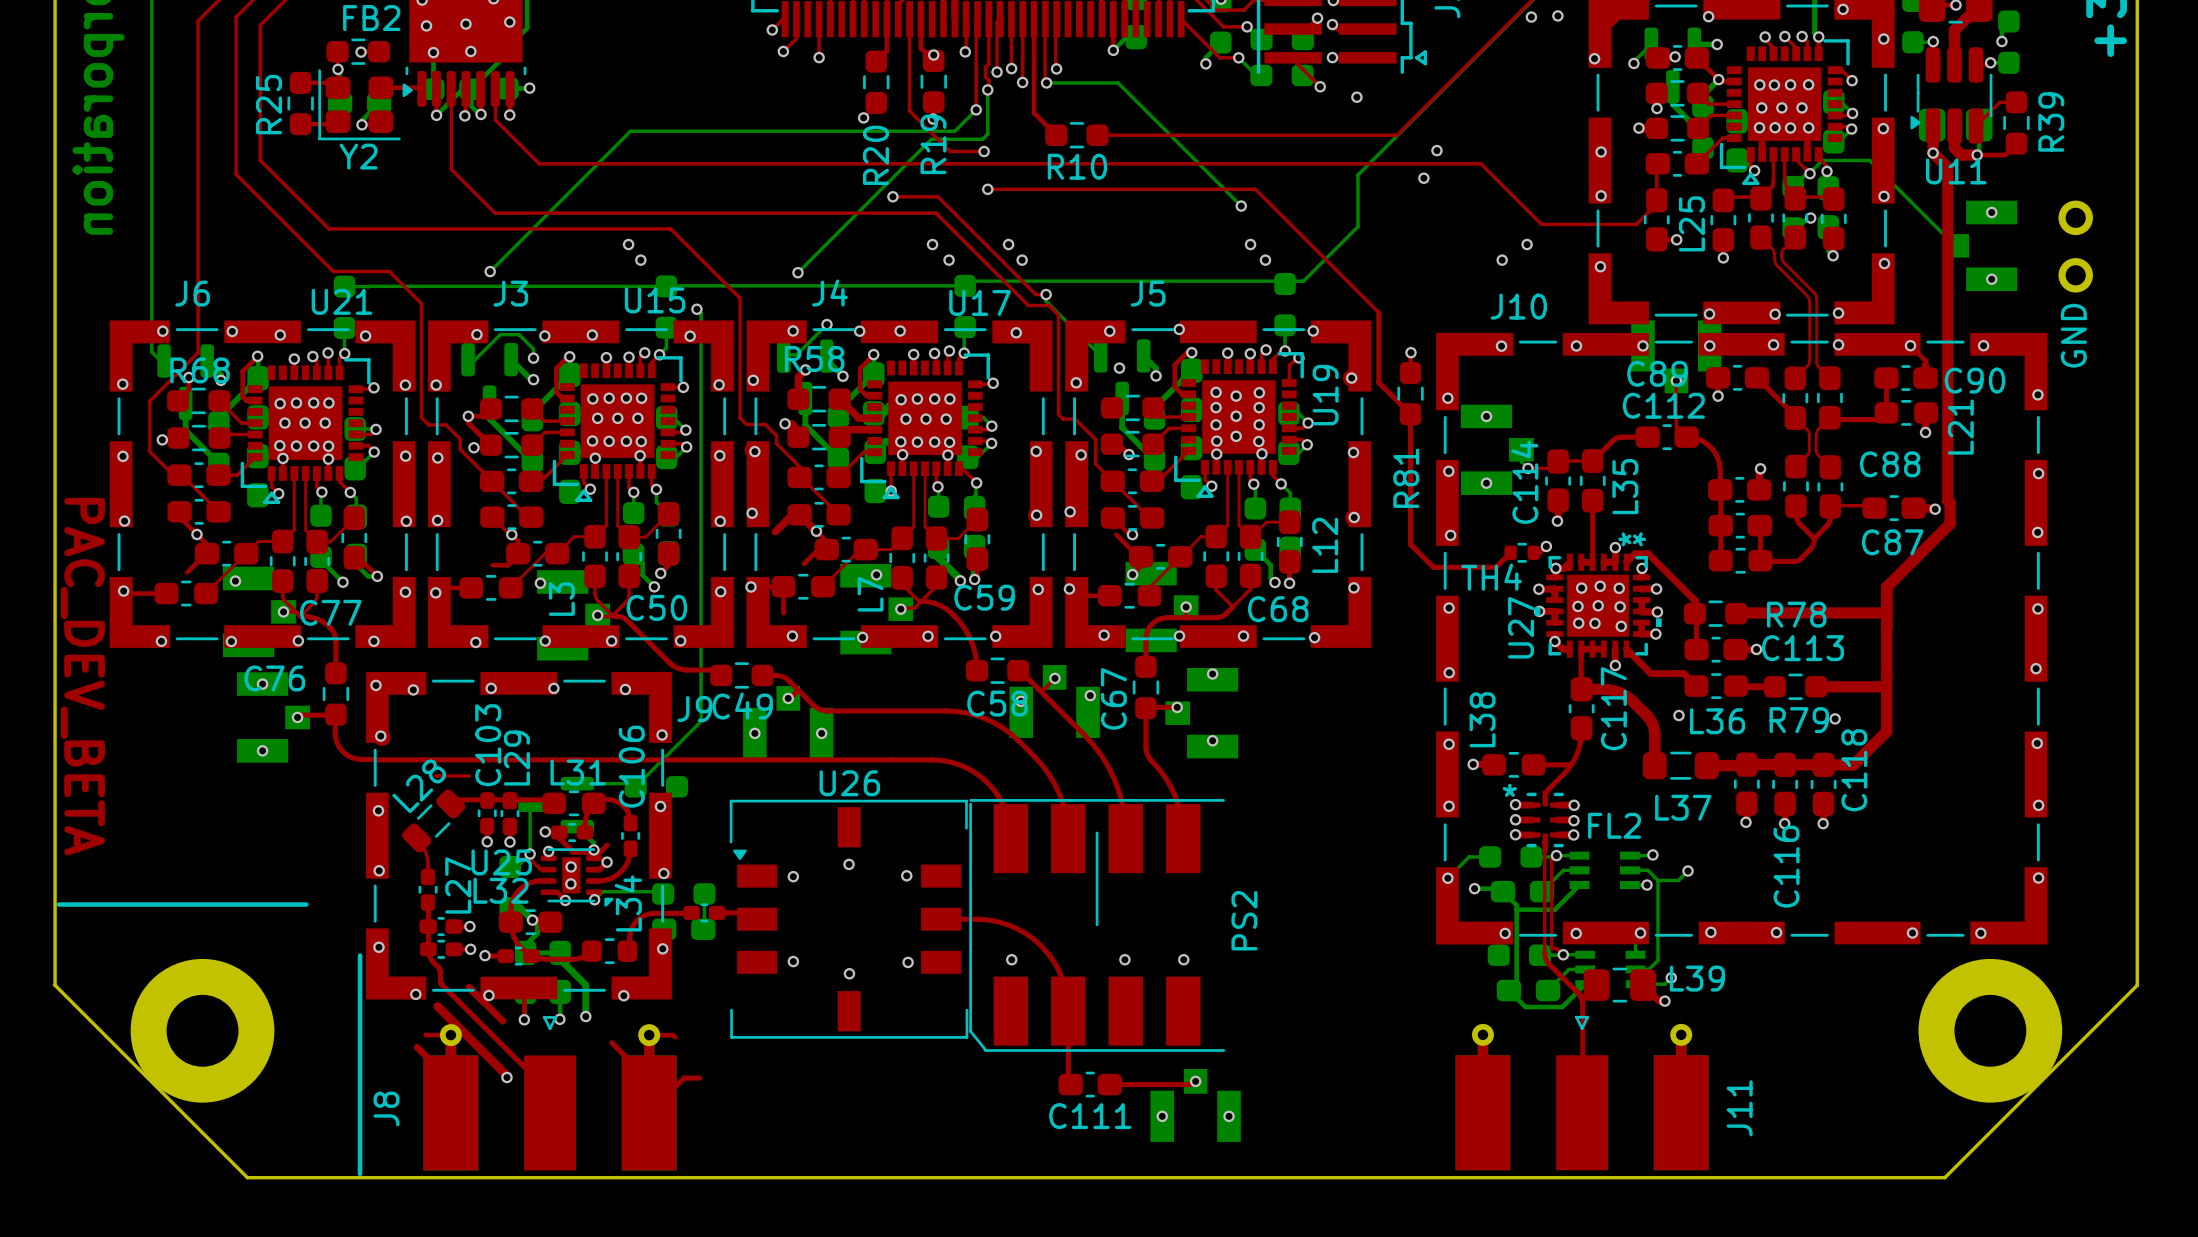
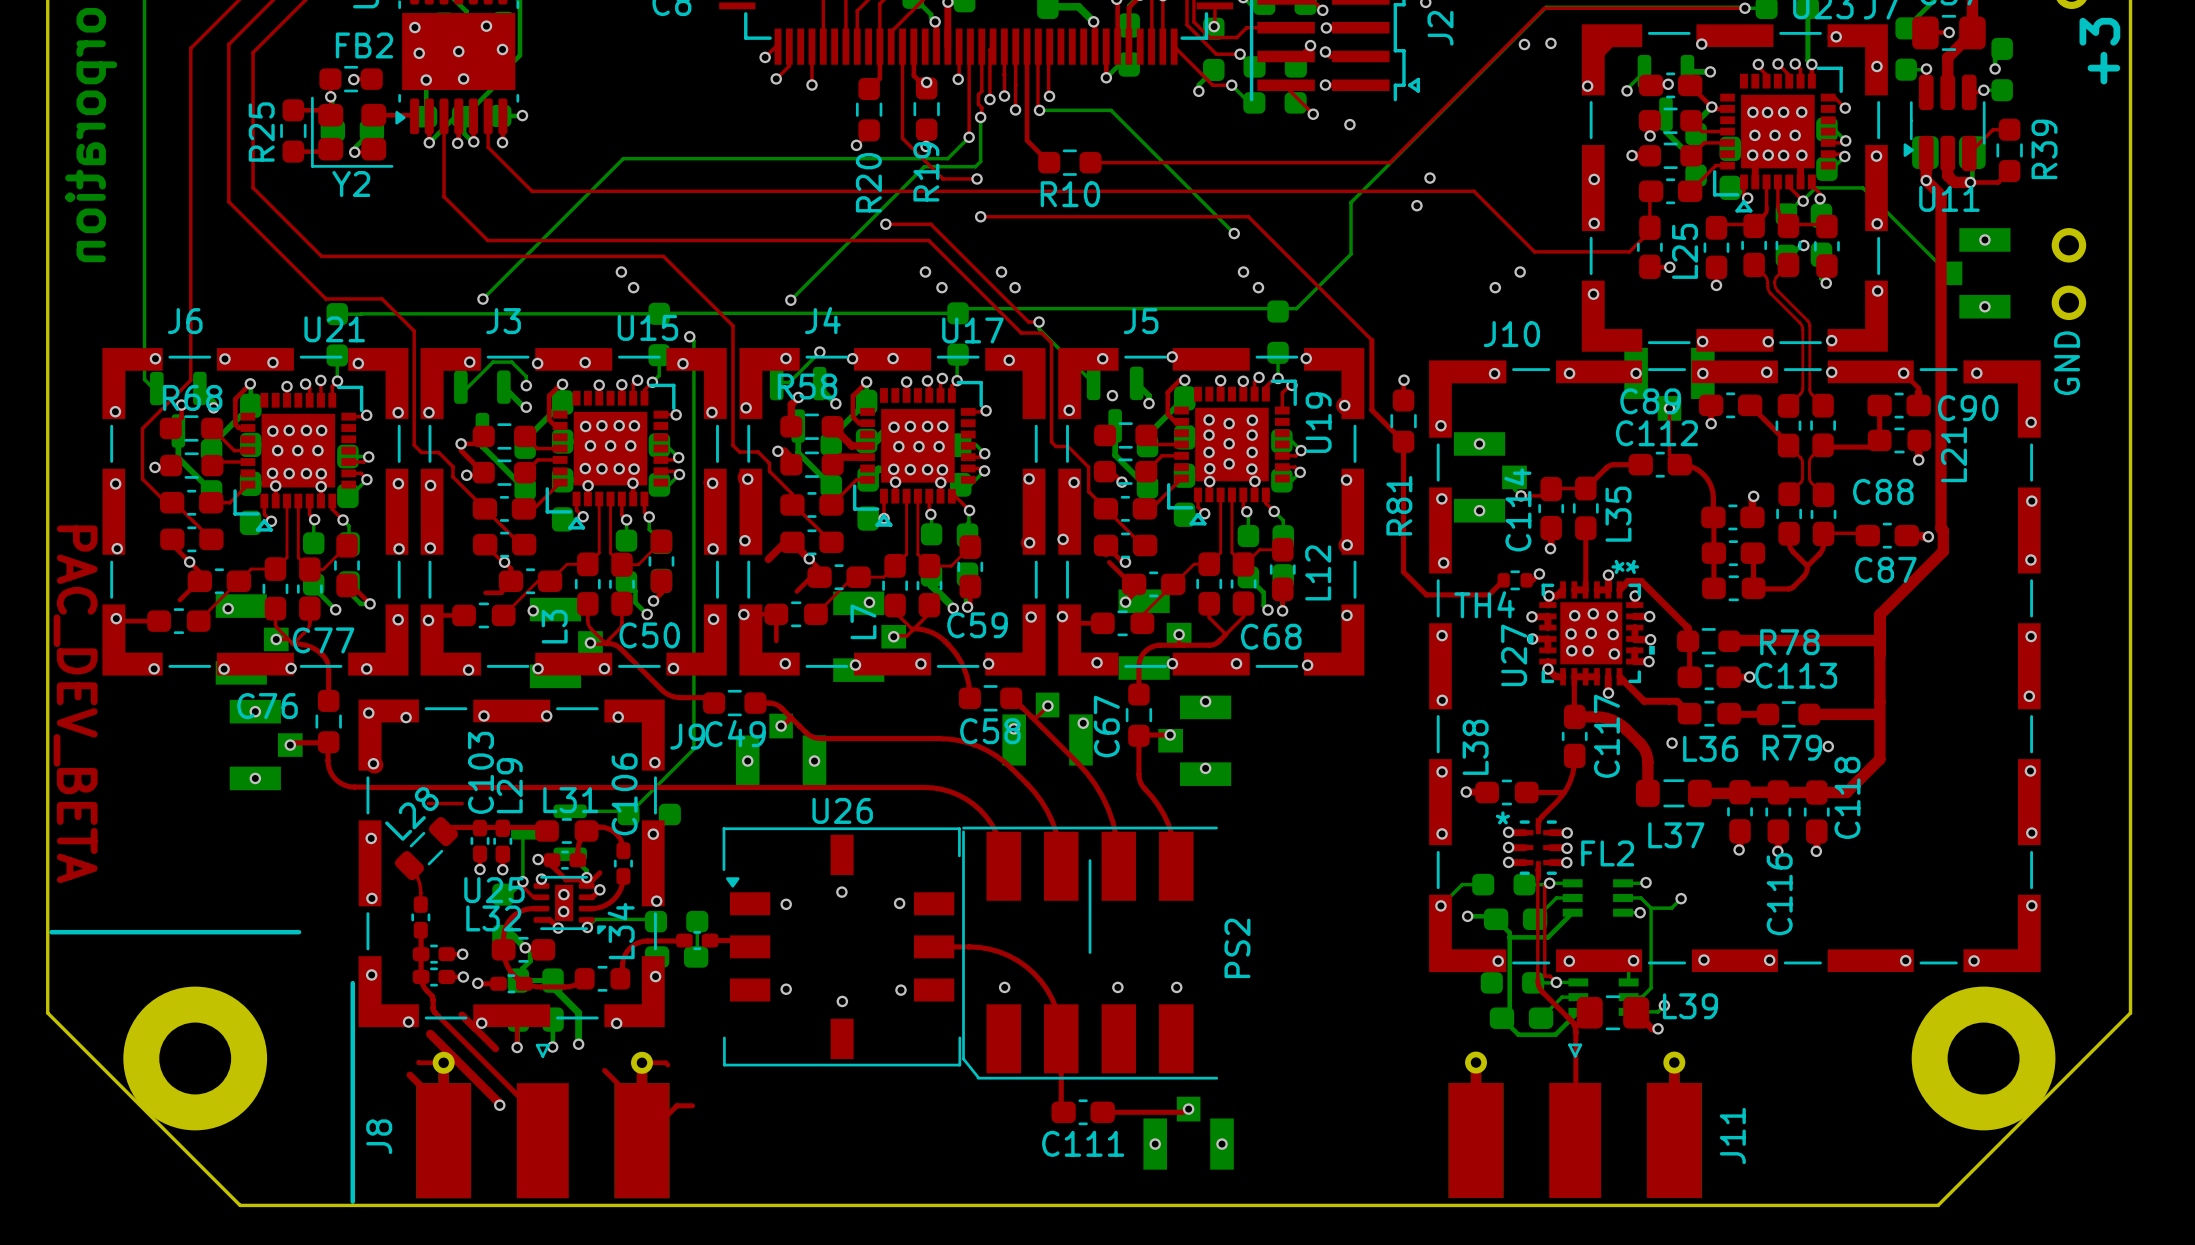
L27: (441, 926) -> none
part: none -> (434, 954)

